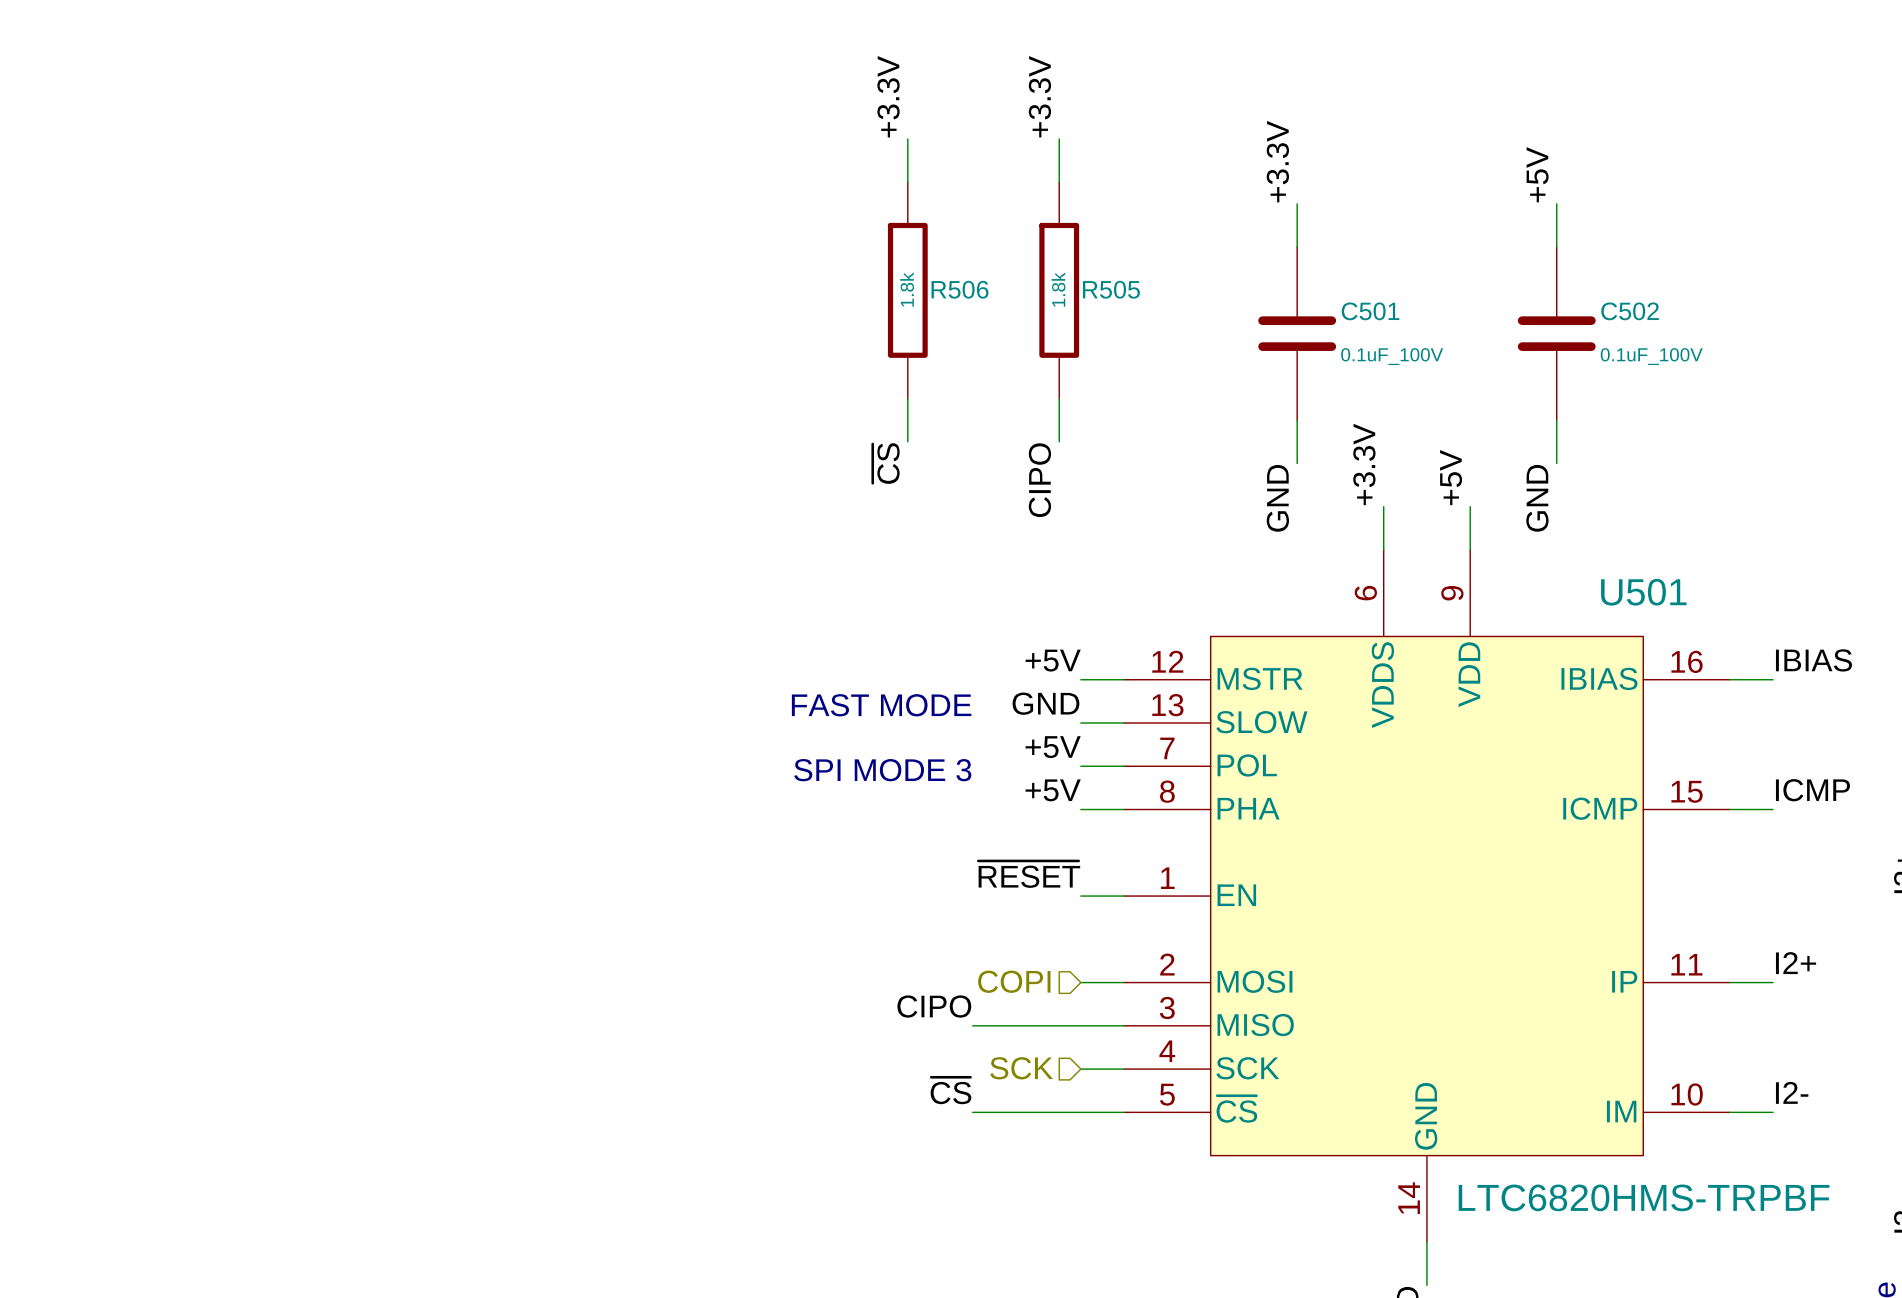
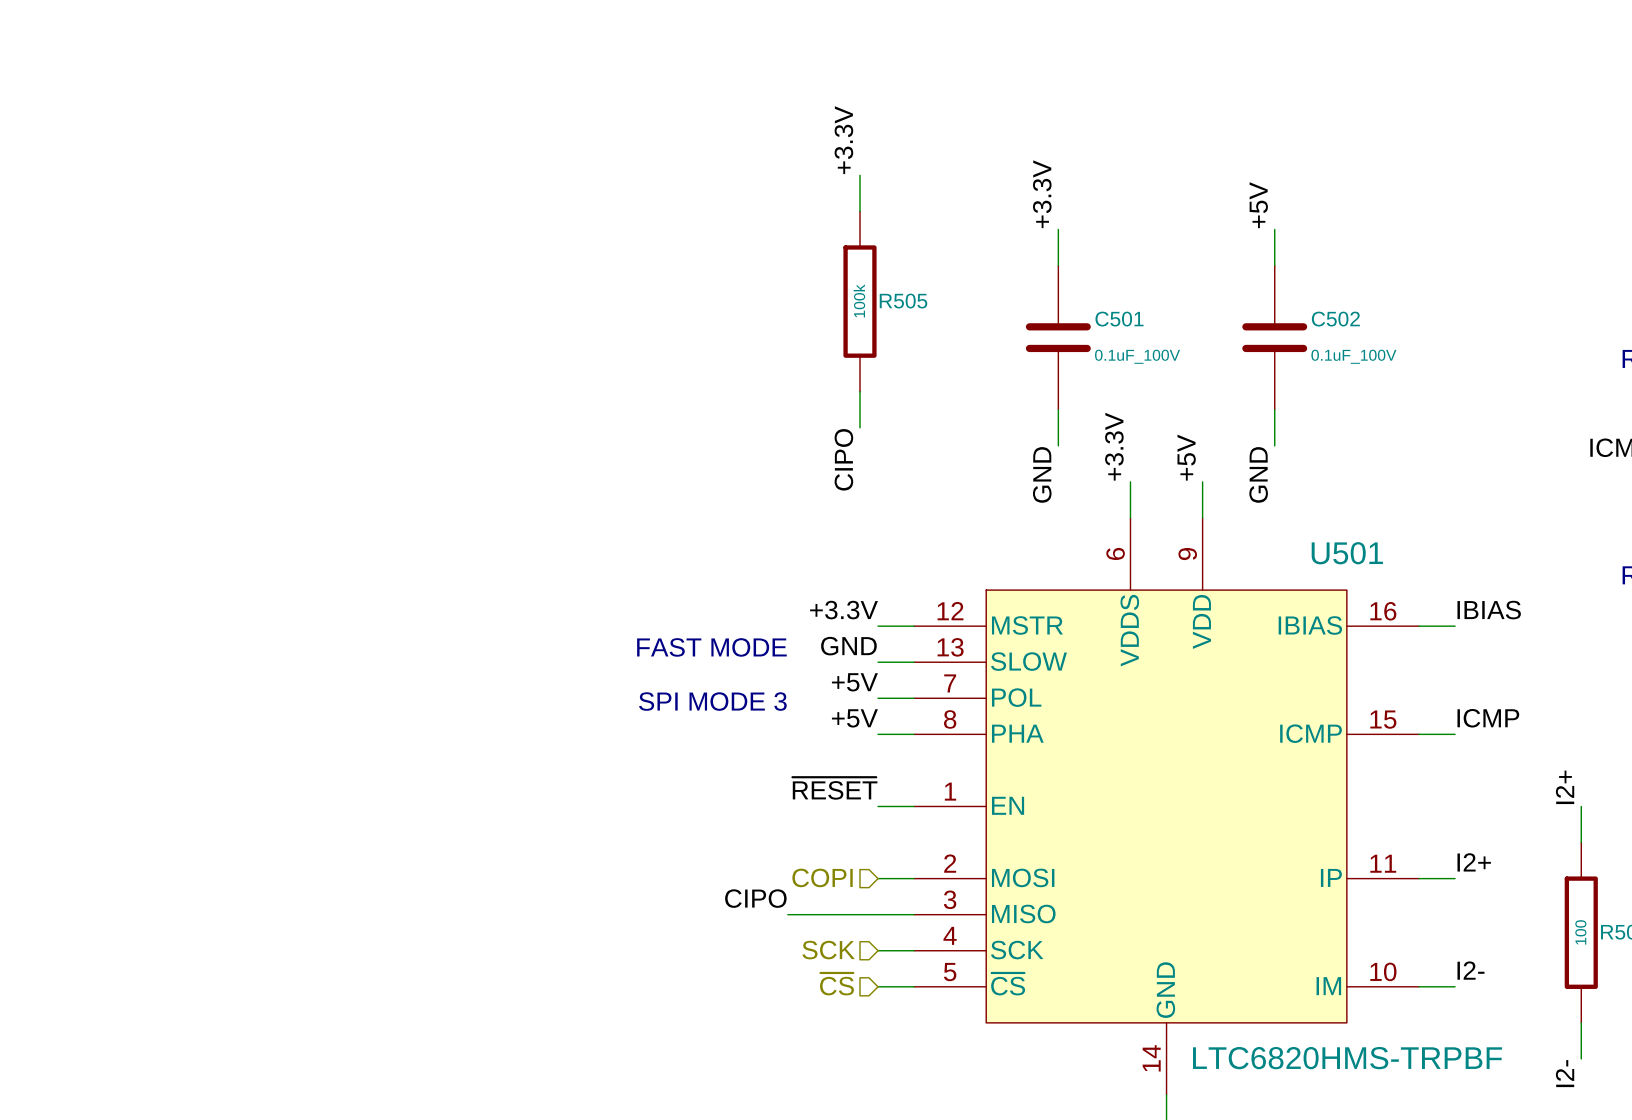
label: +3.3V (888, 96) -> none
wire: (907, 138) (907, 182) -> none
R505 value: 1.8k (1058, 289) -> 100k (859, 300)
R506: 1.8k (907, 290) -> none
wire: (907, 398) (907, 441) -> none
label: ~{CS} (886, 463) -> none
label: +5V (1053, 660) -> +3.3V (844, 610)
label: ~{CS} (950, 1090) -> none
hierarchical label: none -> ~{CS} (836, 984)
wire: (972, 1112) (1080, 1112) -> none

